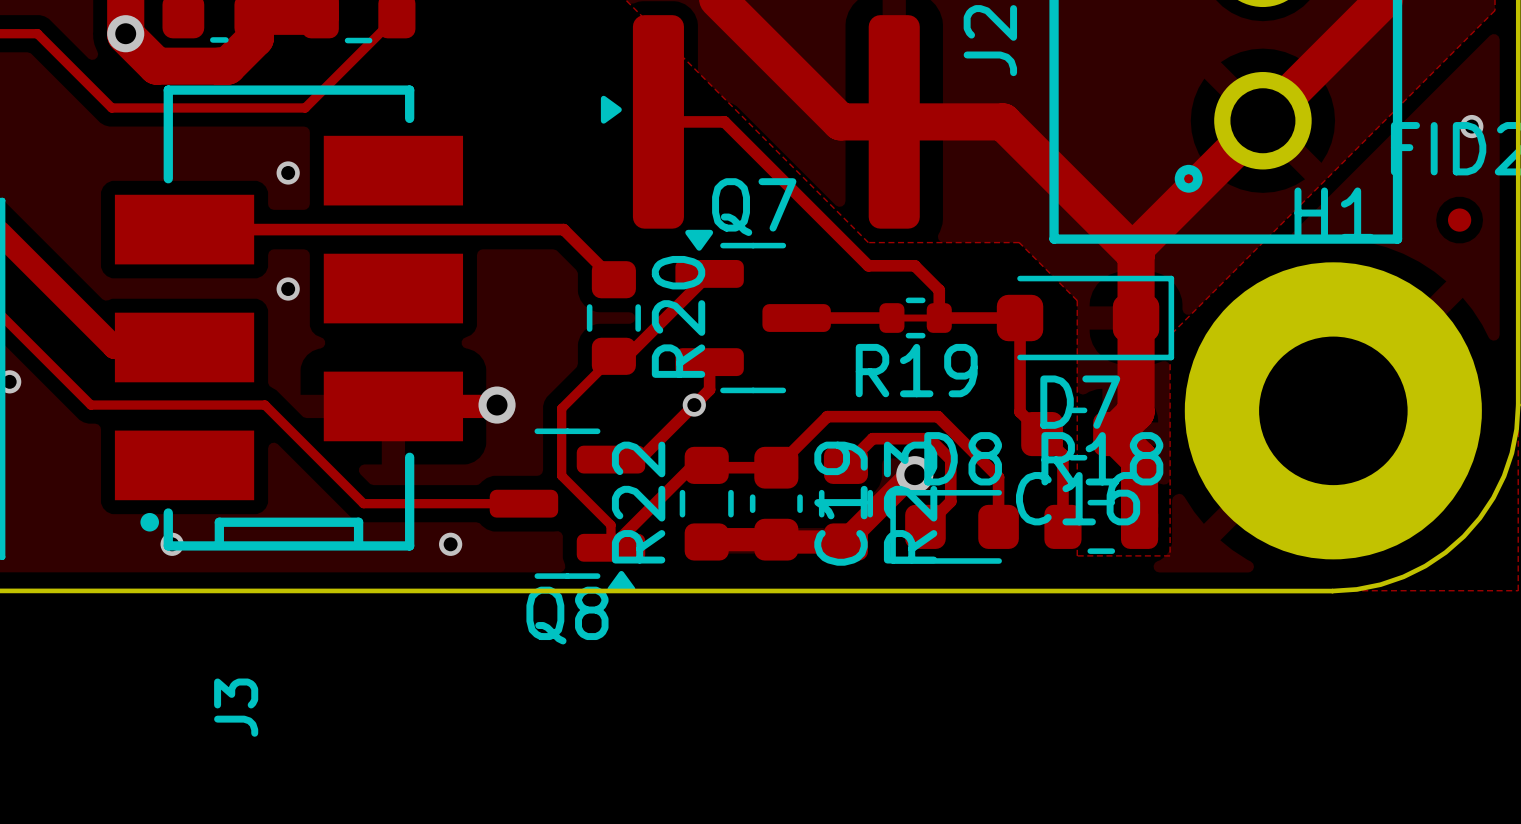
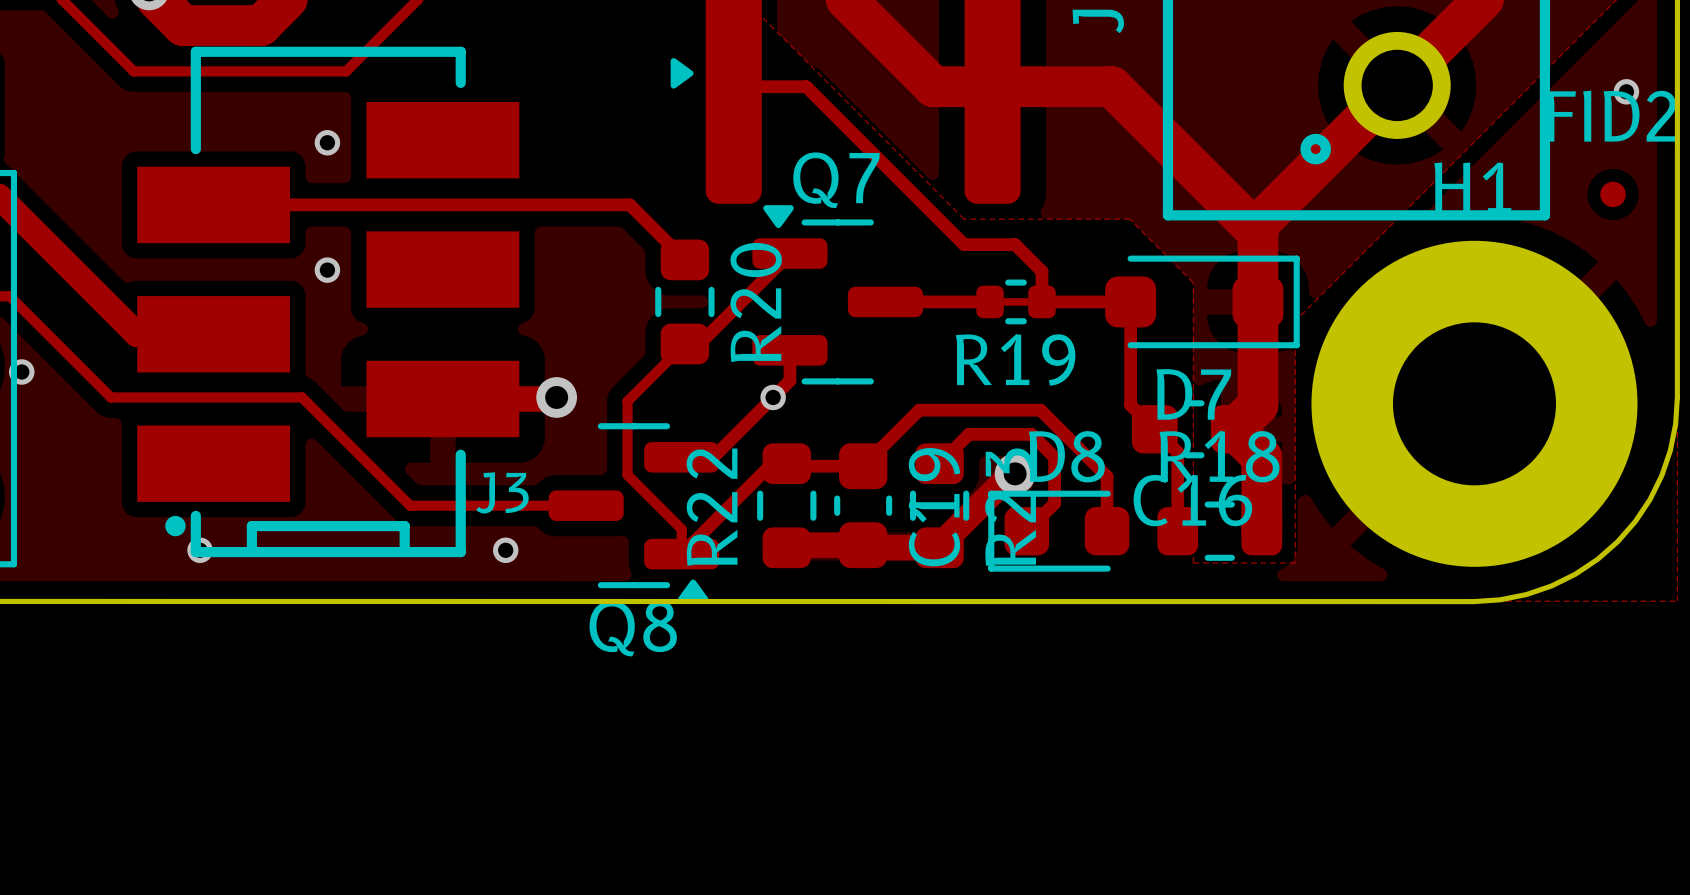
J3 name rotation: 0° (236, 707) -> 90° clockwise (502, 492)
J3 name position: J3 (236, 707) -> J3 (502, 492)

